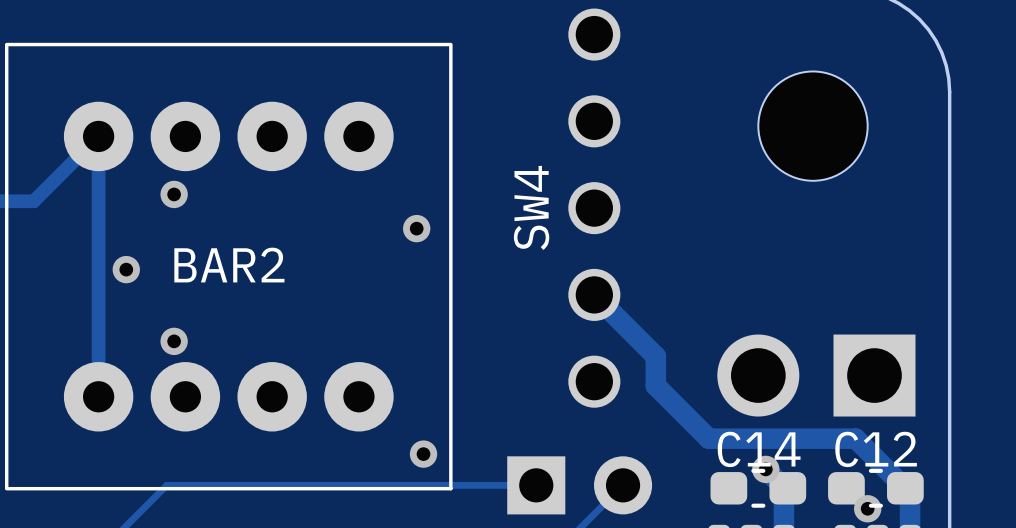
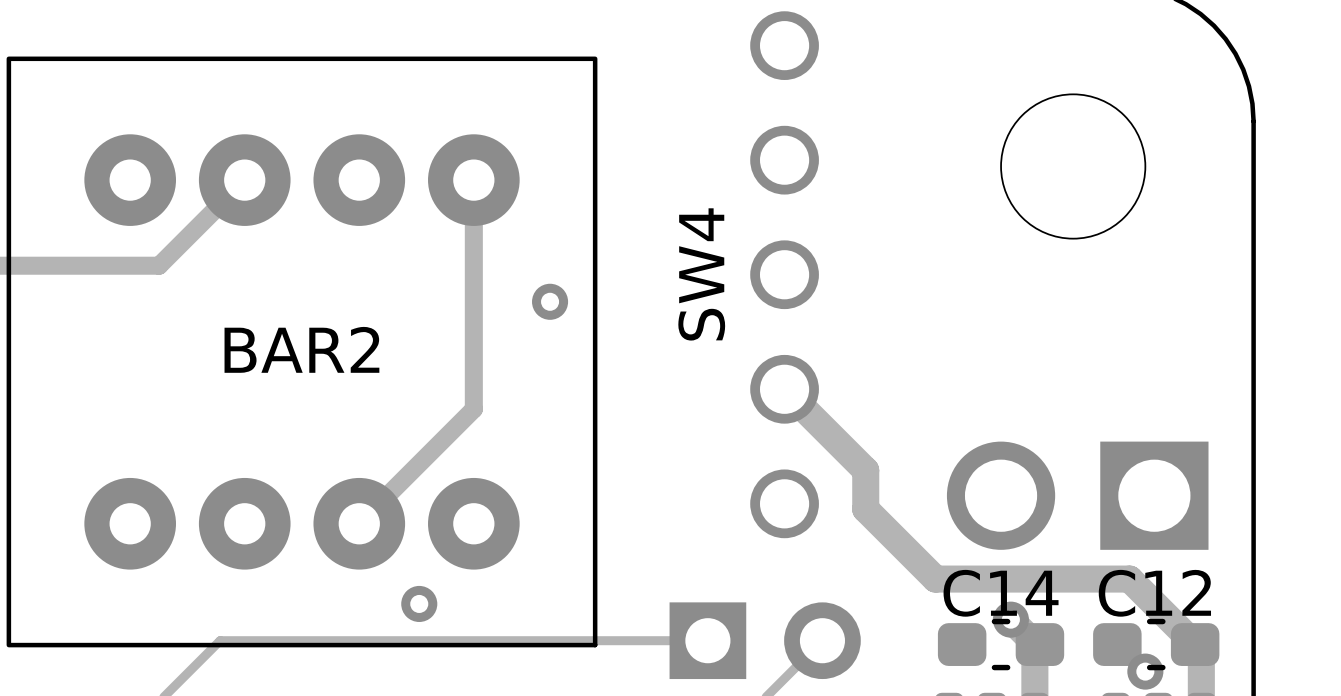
track: none -> (473, 180) (473, 409) (359, 523)
via: (174, 194) -> none
track: (33, 201) (98, 136) (98, 396) -> (44, 265) (159, 265) (244, 180)
via: (126, 269) -> none
via: (174, 341) -> none
via: (423, 454) -> none
via: none -> (419, 603)

